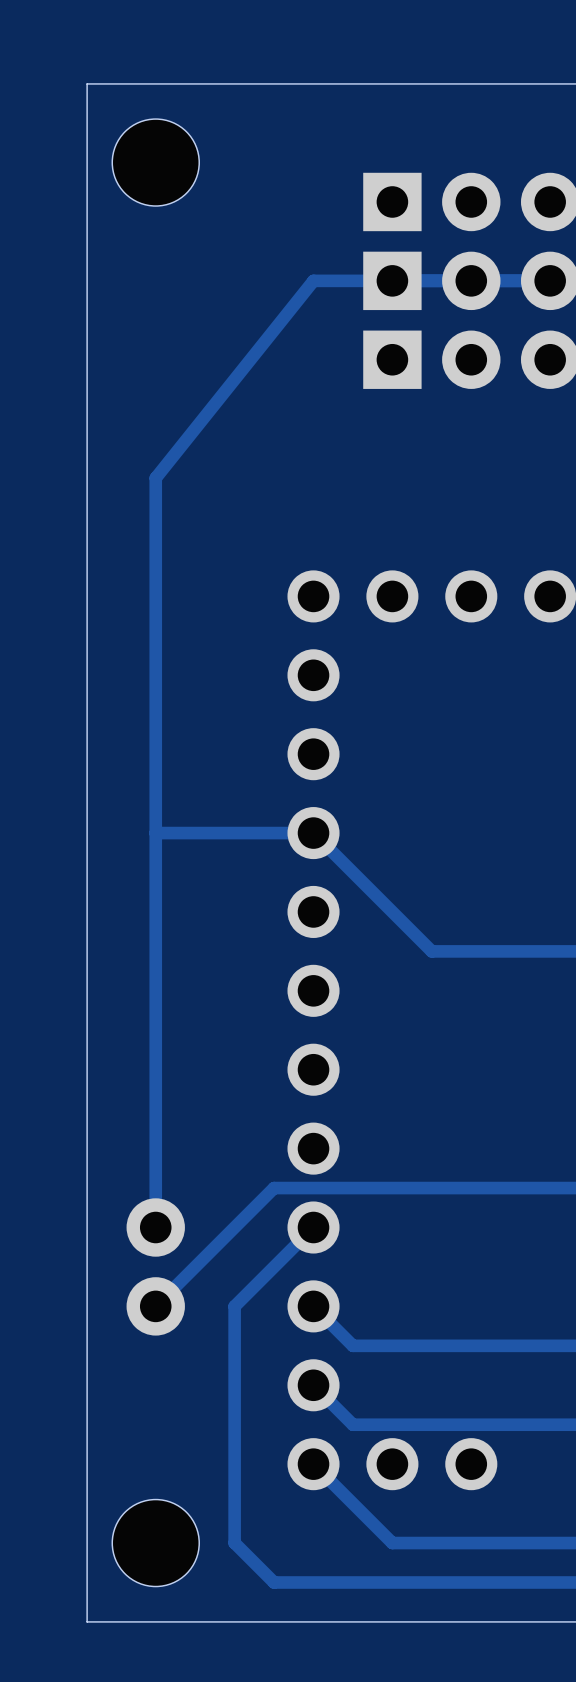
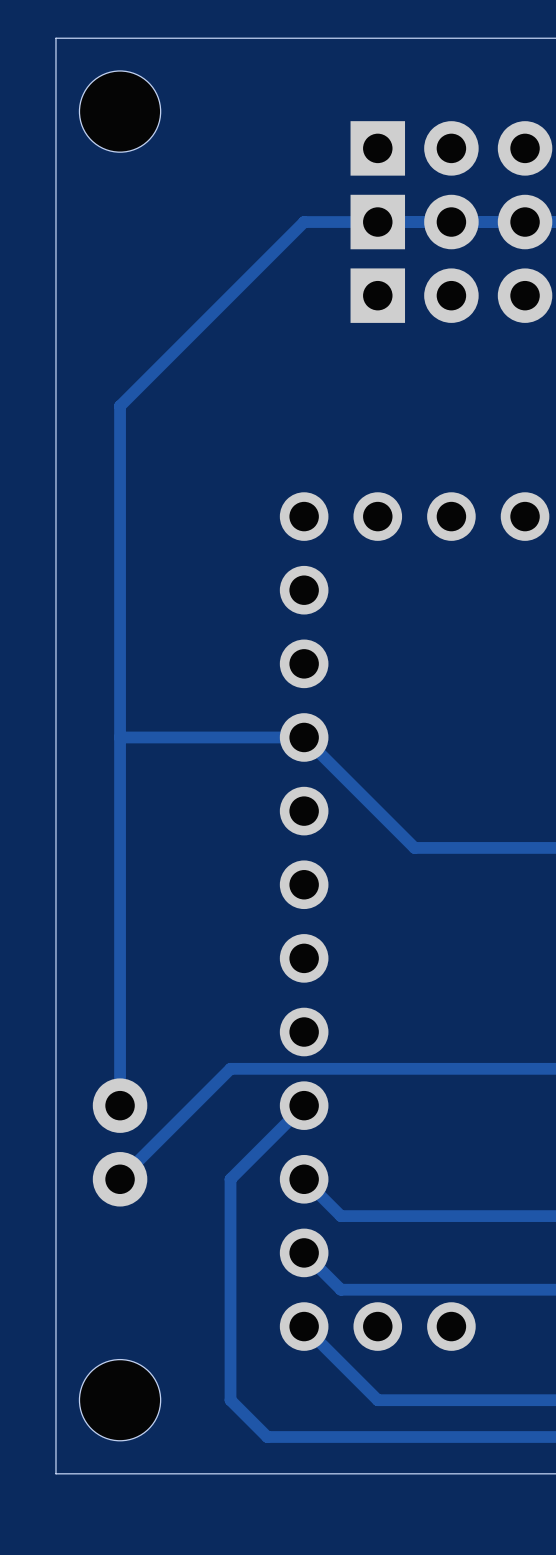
board edge: (87, 83) (87, 1621) -> (92, 38) (55, 38) (55, 1473) (92, 1473)
hole position: (155, 162) -> (120, 111)
track: (313, 280) (155, 478) (155, 1227) -> (304, 222) (120, 406) (120, 1105)
track: none -> (156, 737) (120, 737)
track: (274, 1188) (155, 1306) -> (267, 1068) (230, 1068) (120, 1179)
part position: (155, 1266) -> (120, 1142)
hole position: (155, 1543) -> (120, 1400)

